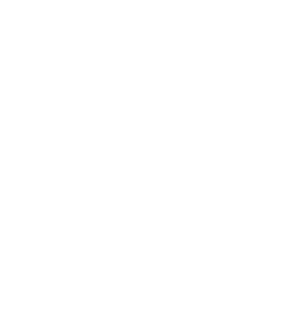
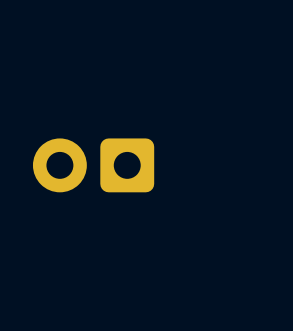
part: none -> (93, 165)

